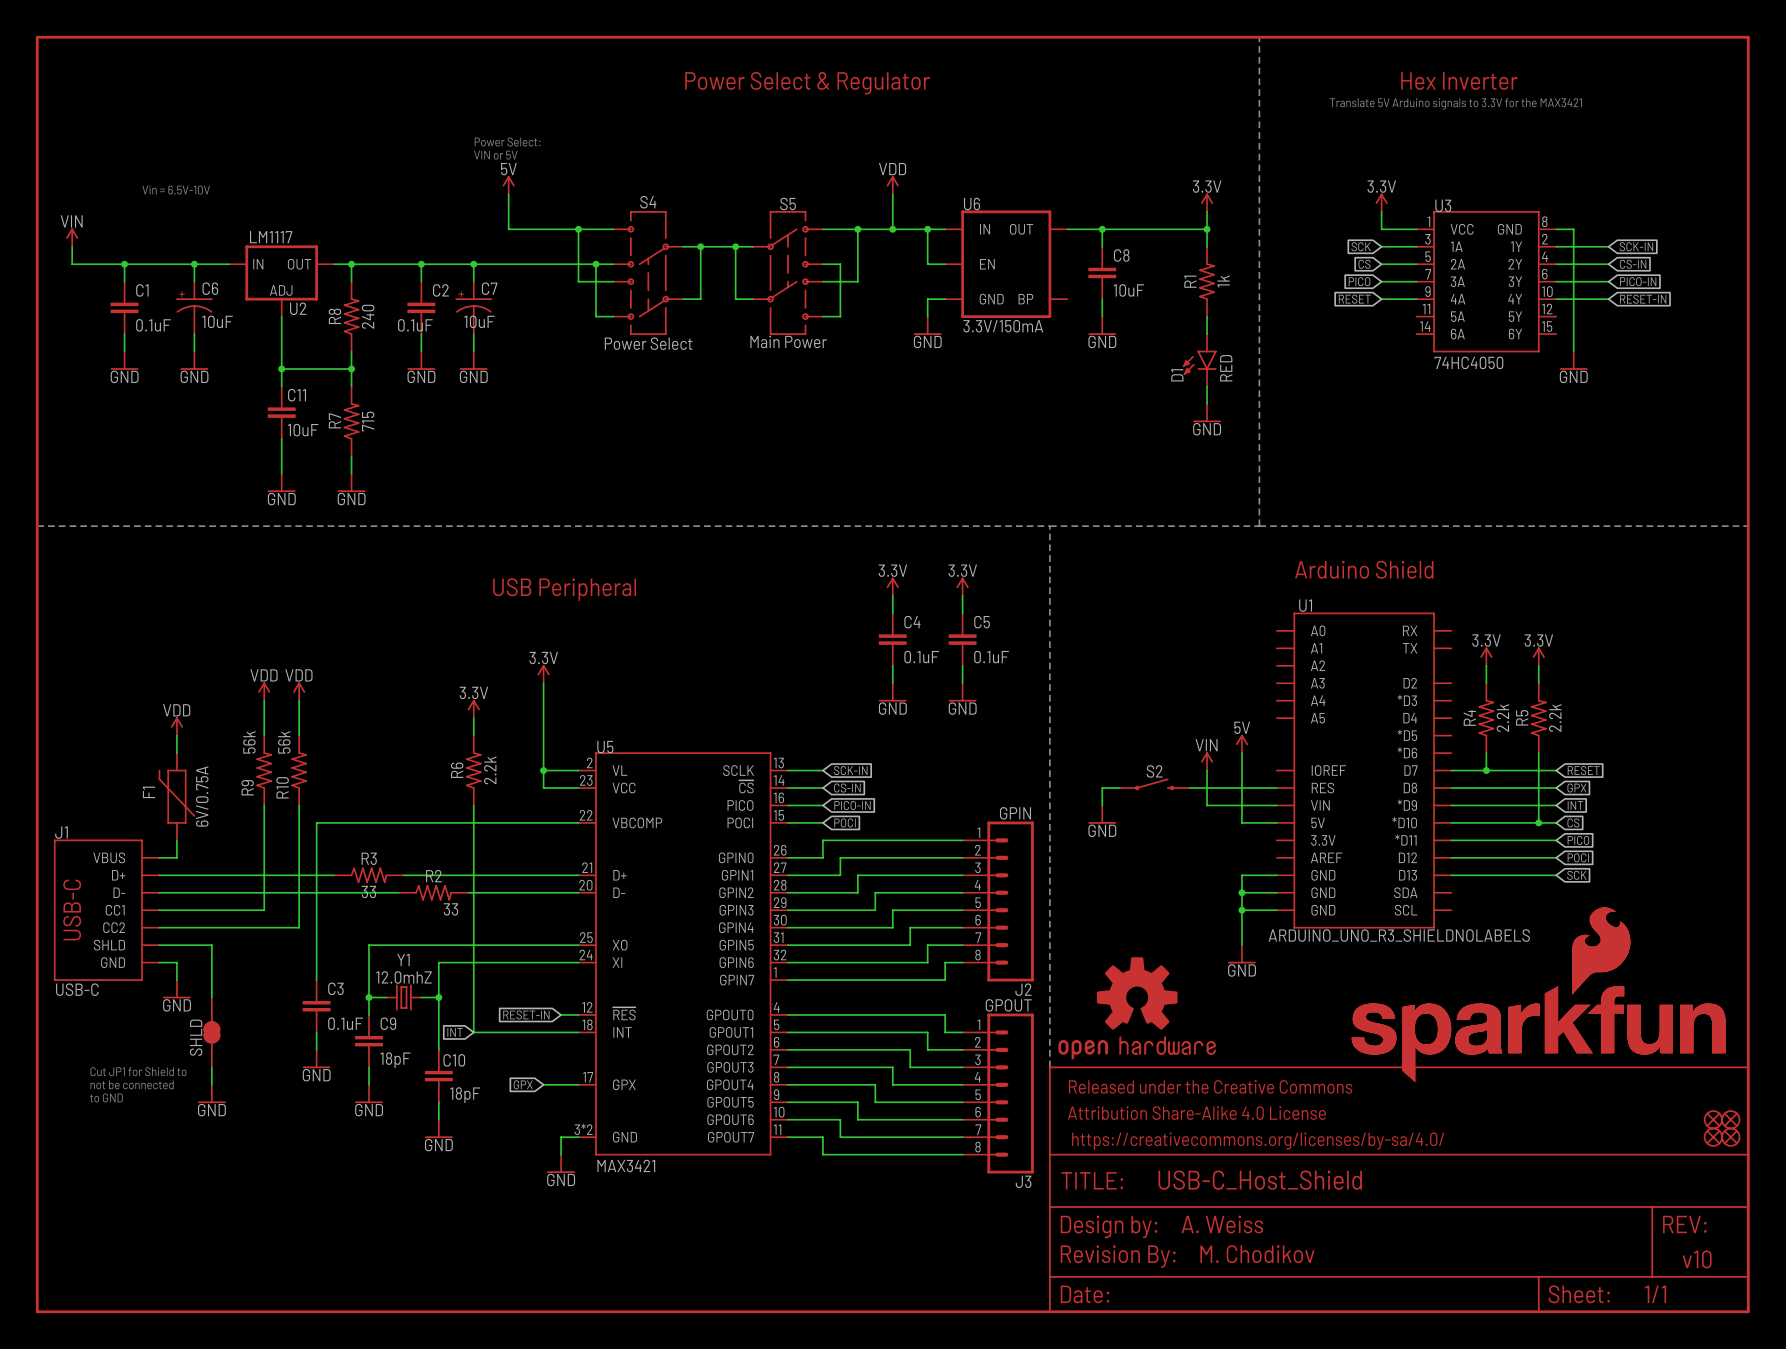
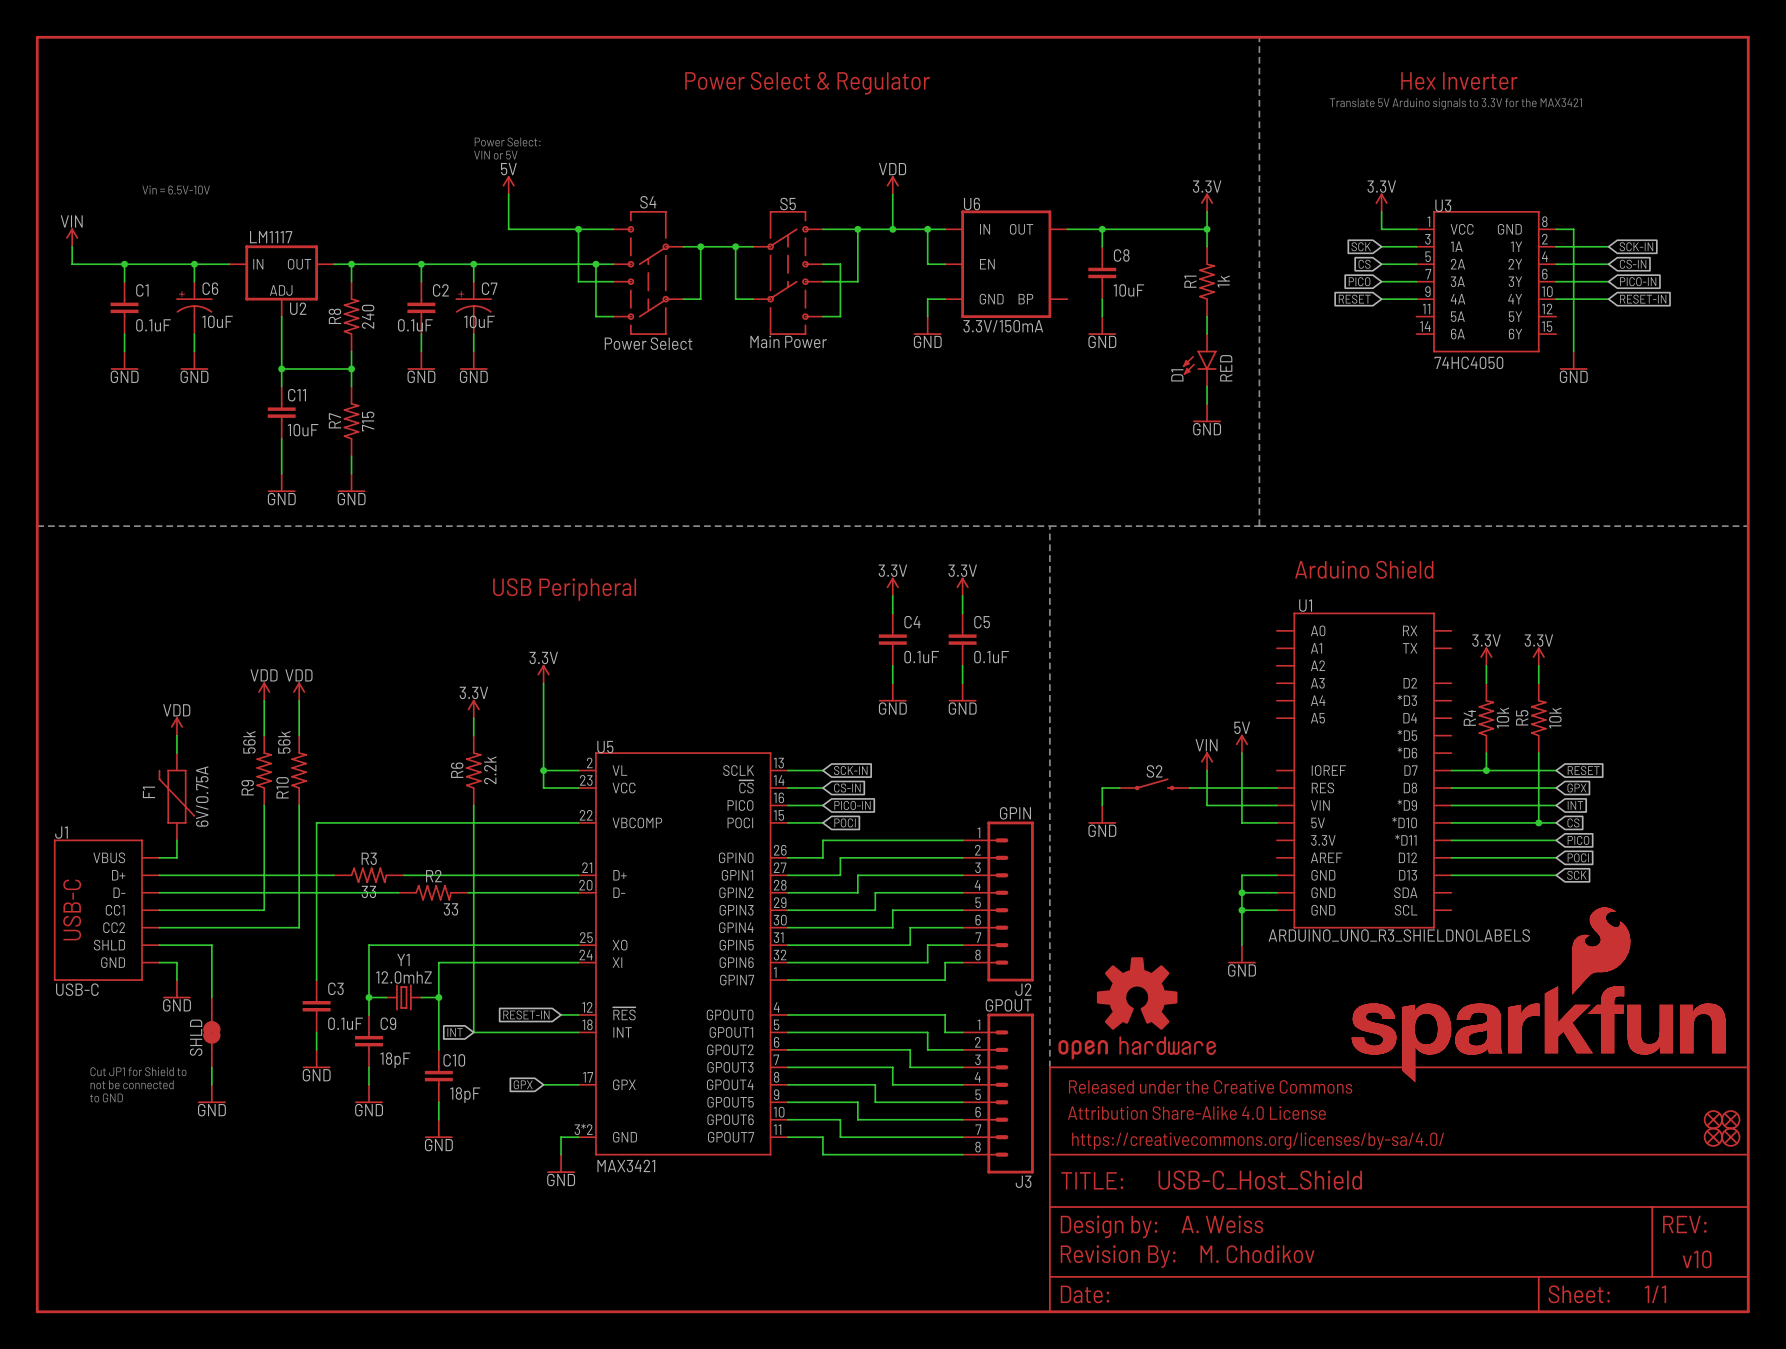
R4 value: 2.2k (1502, 717) -> 10k (1502, 717)
R5 value: 2.2k (1555, 717) -> 10k (1555, 717)

